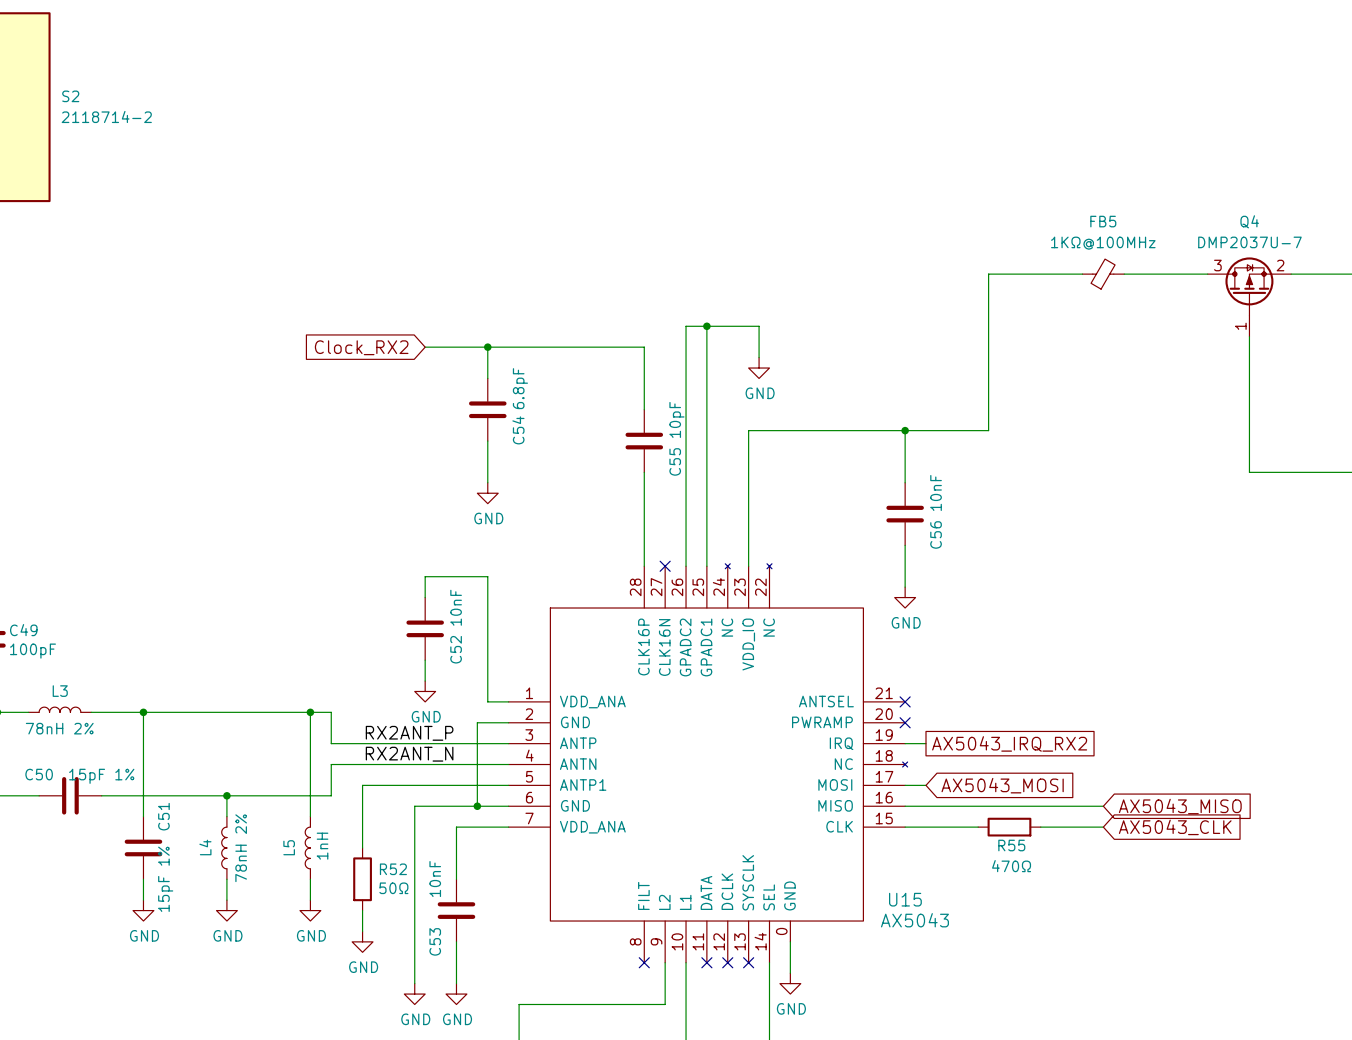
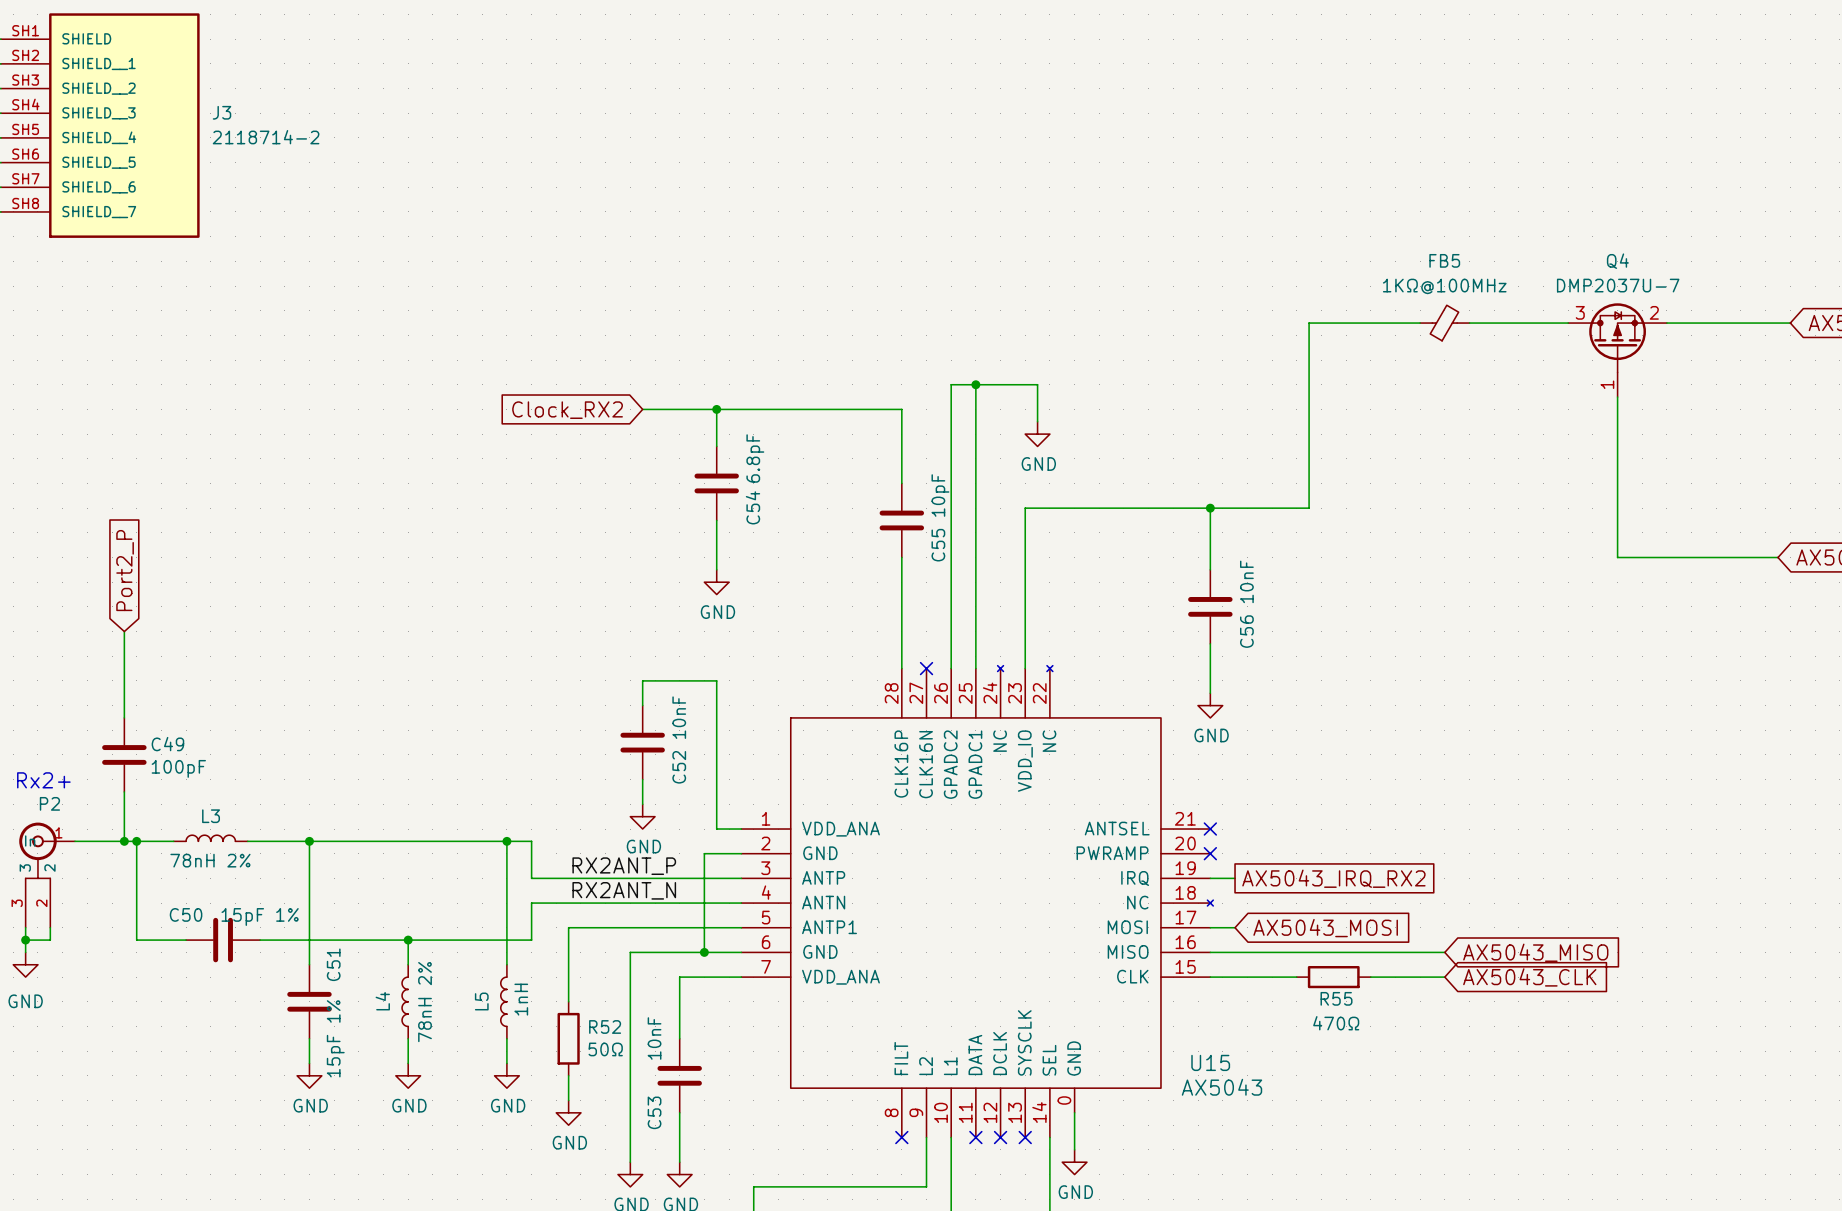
S2 name: S2 (70, 96) -> J3 (222, 112)

